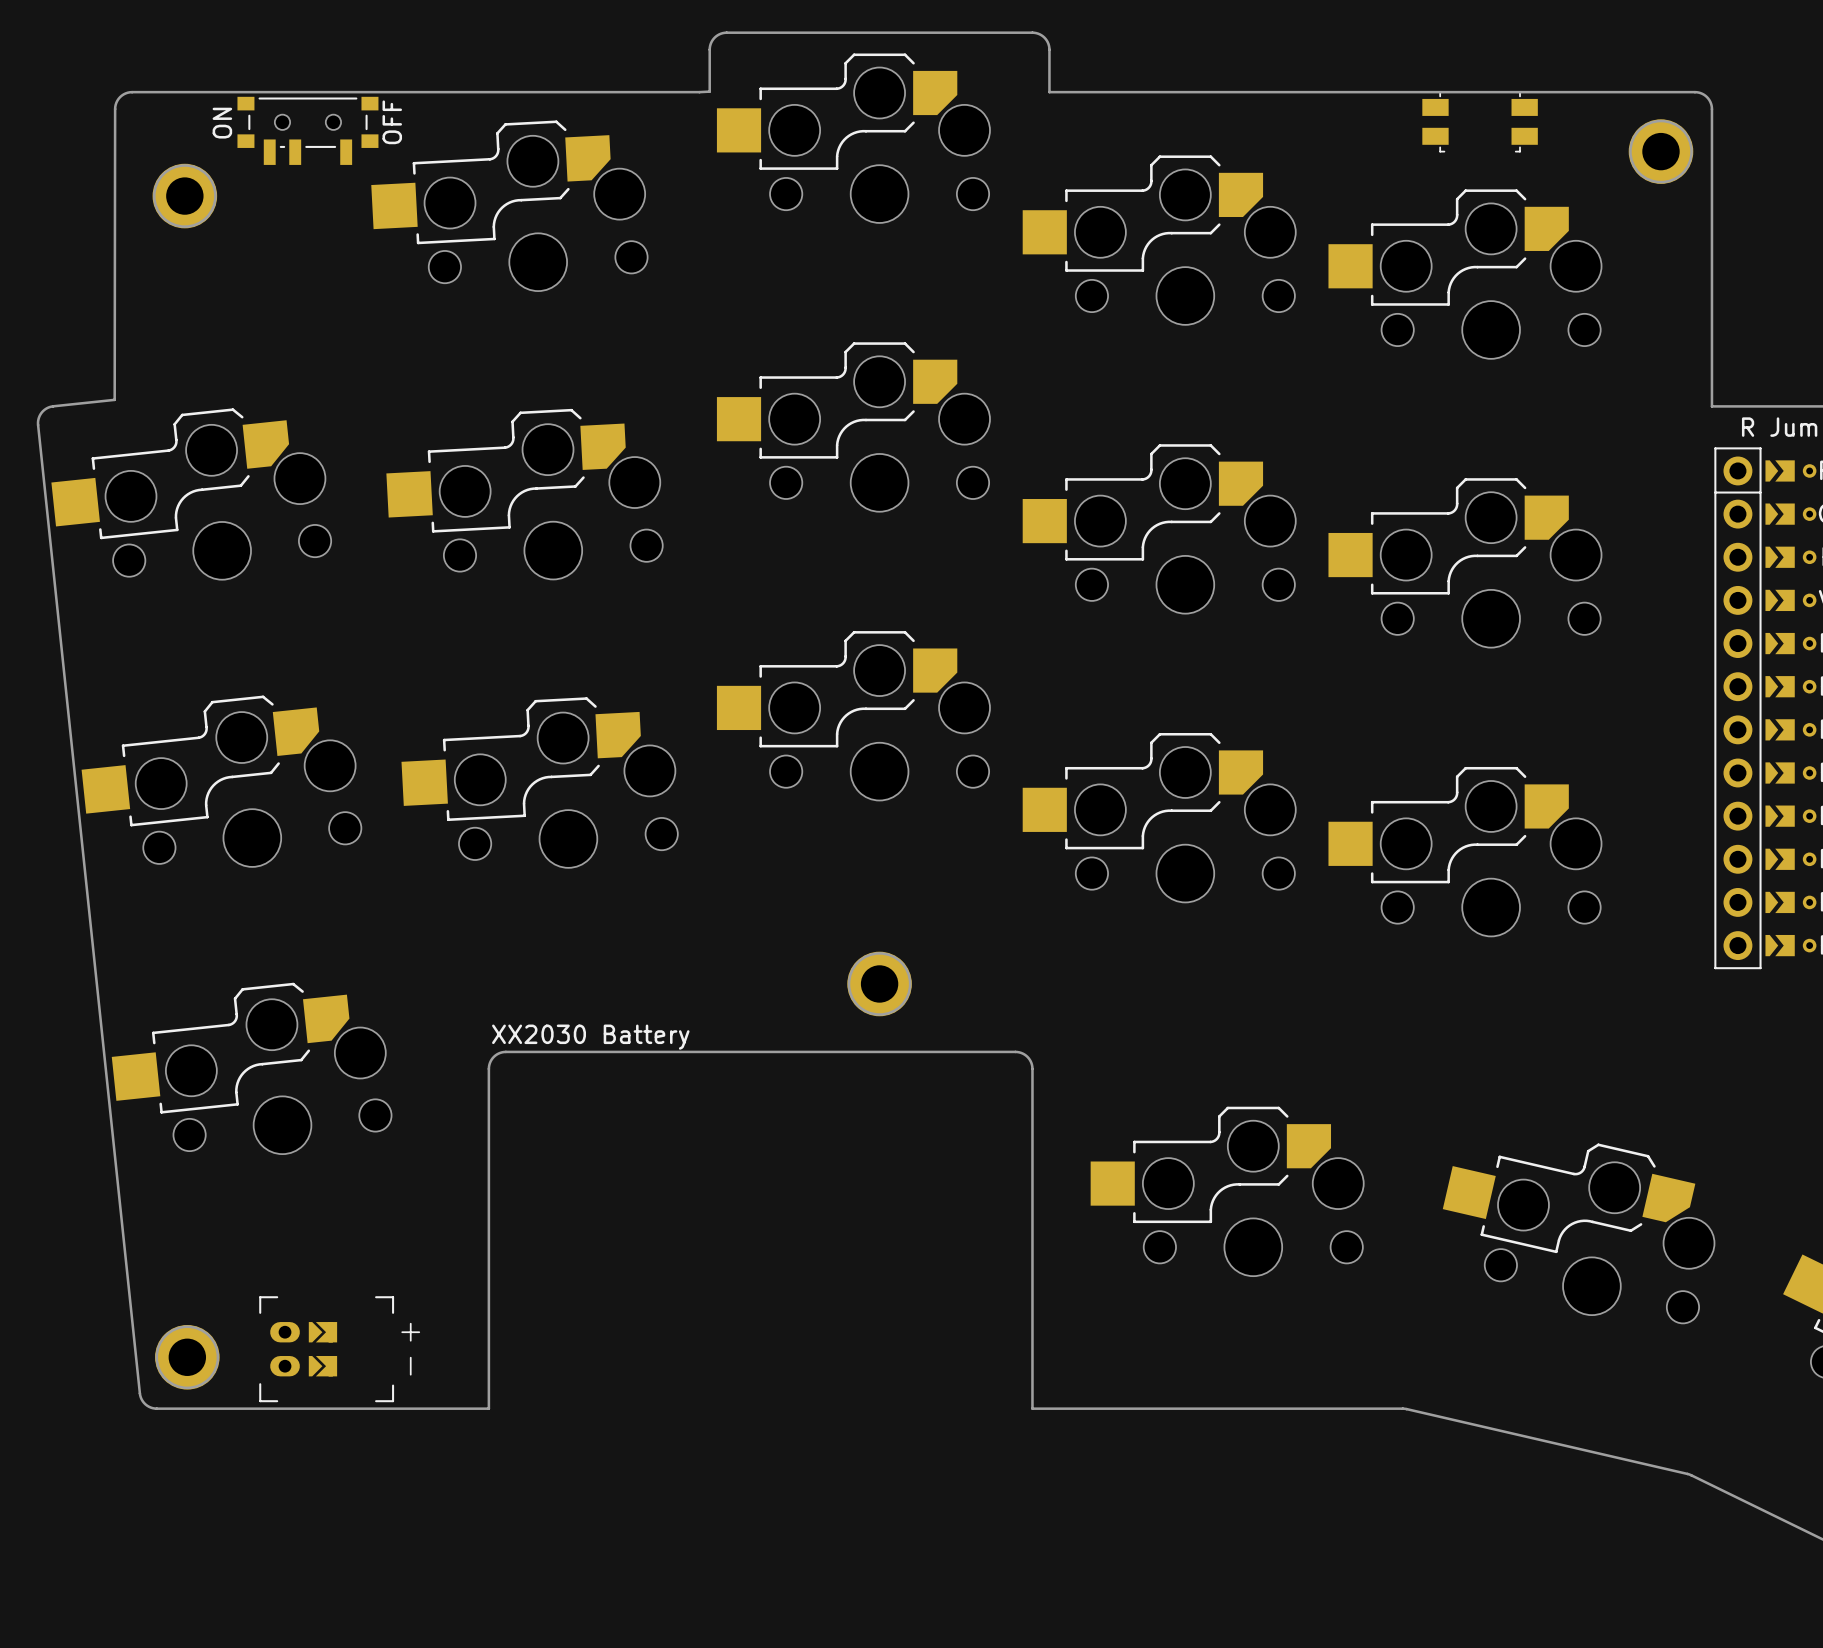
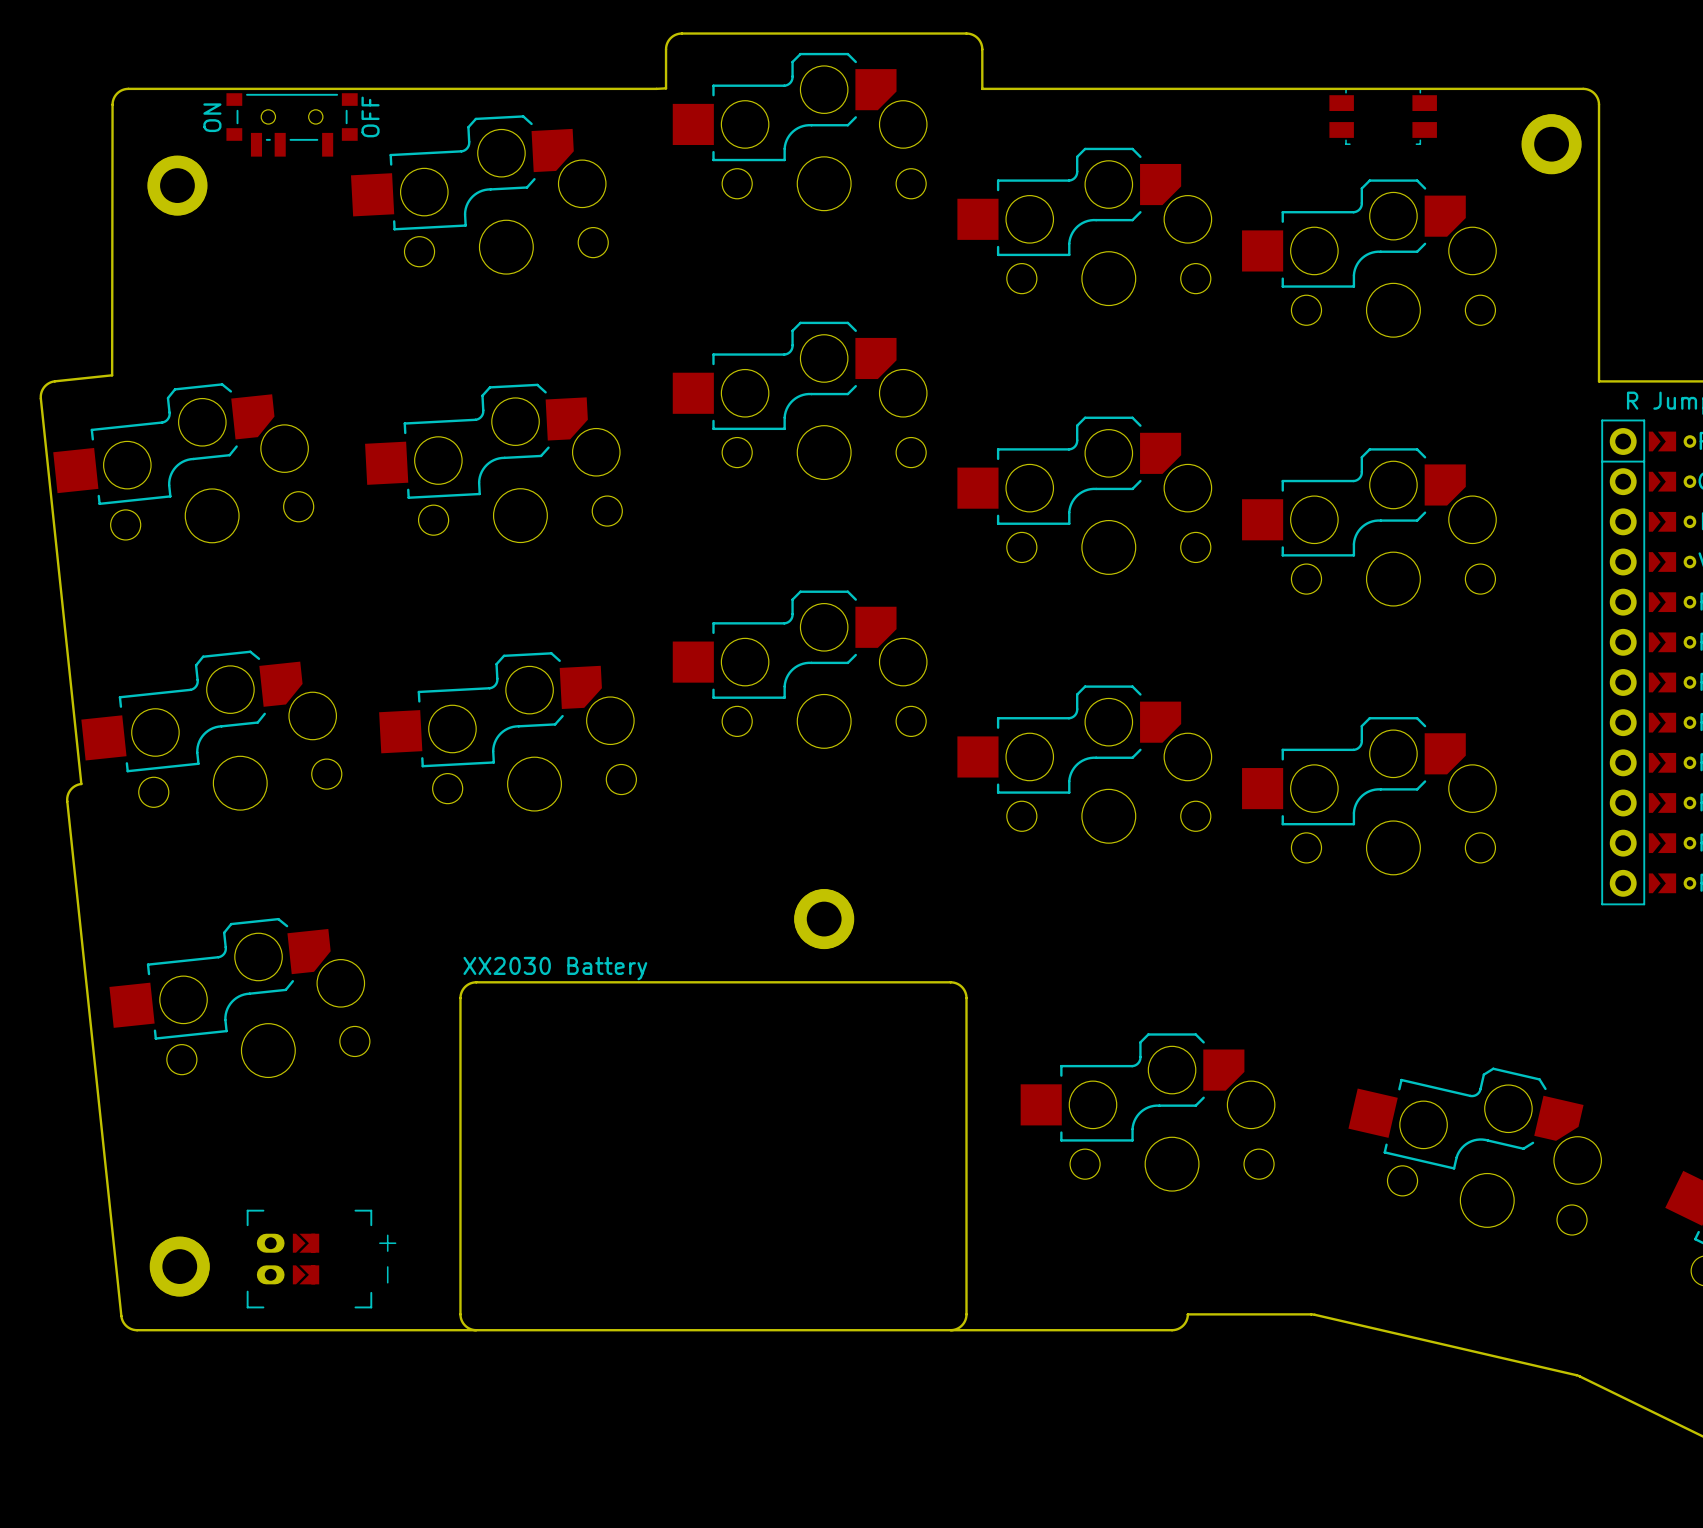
board edge: (81, 838) (139, 1393) (142, 1401) (148, 1406) (156, 1408) (488, 1408) -> (476, 1330) (465, 1325) (460, 1314)
board edge: none -> (81, 784) (70, 789) (67, 801) (121, 1316) (123, 1323) (129, 1328) (137, 1330) (1172, 1330) (1183, 1325) (1187, 1314)
board edge: (1032, 1408) (1270, 1408) -> (966, 1314) (961, 1325) (950, 1330)

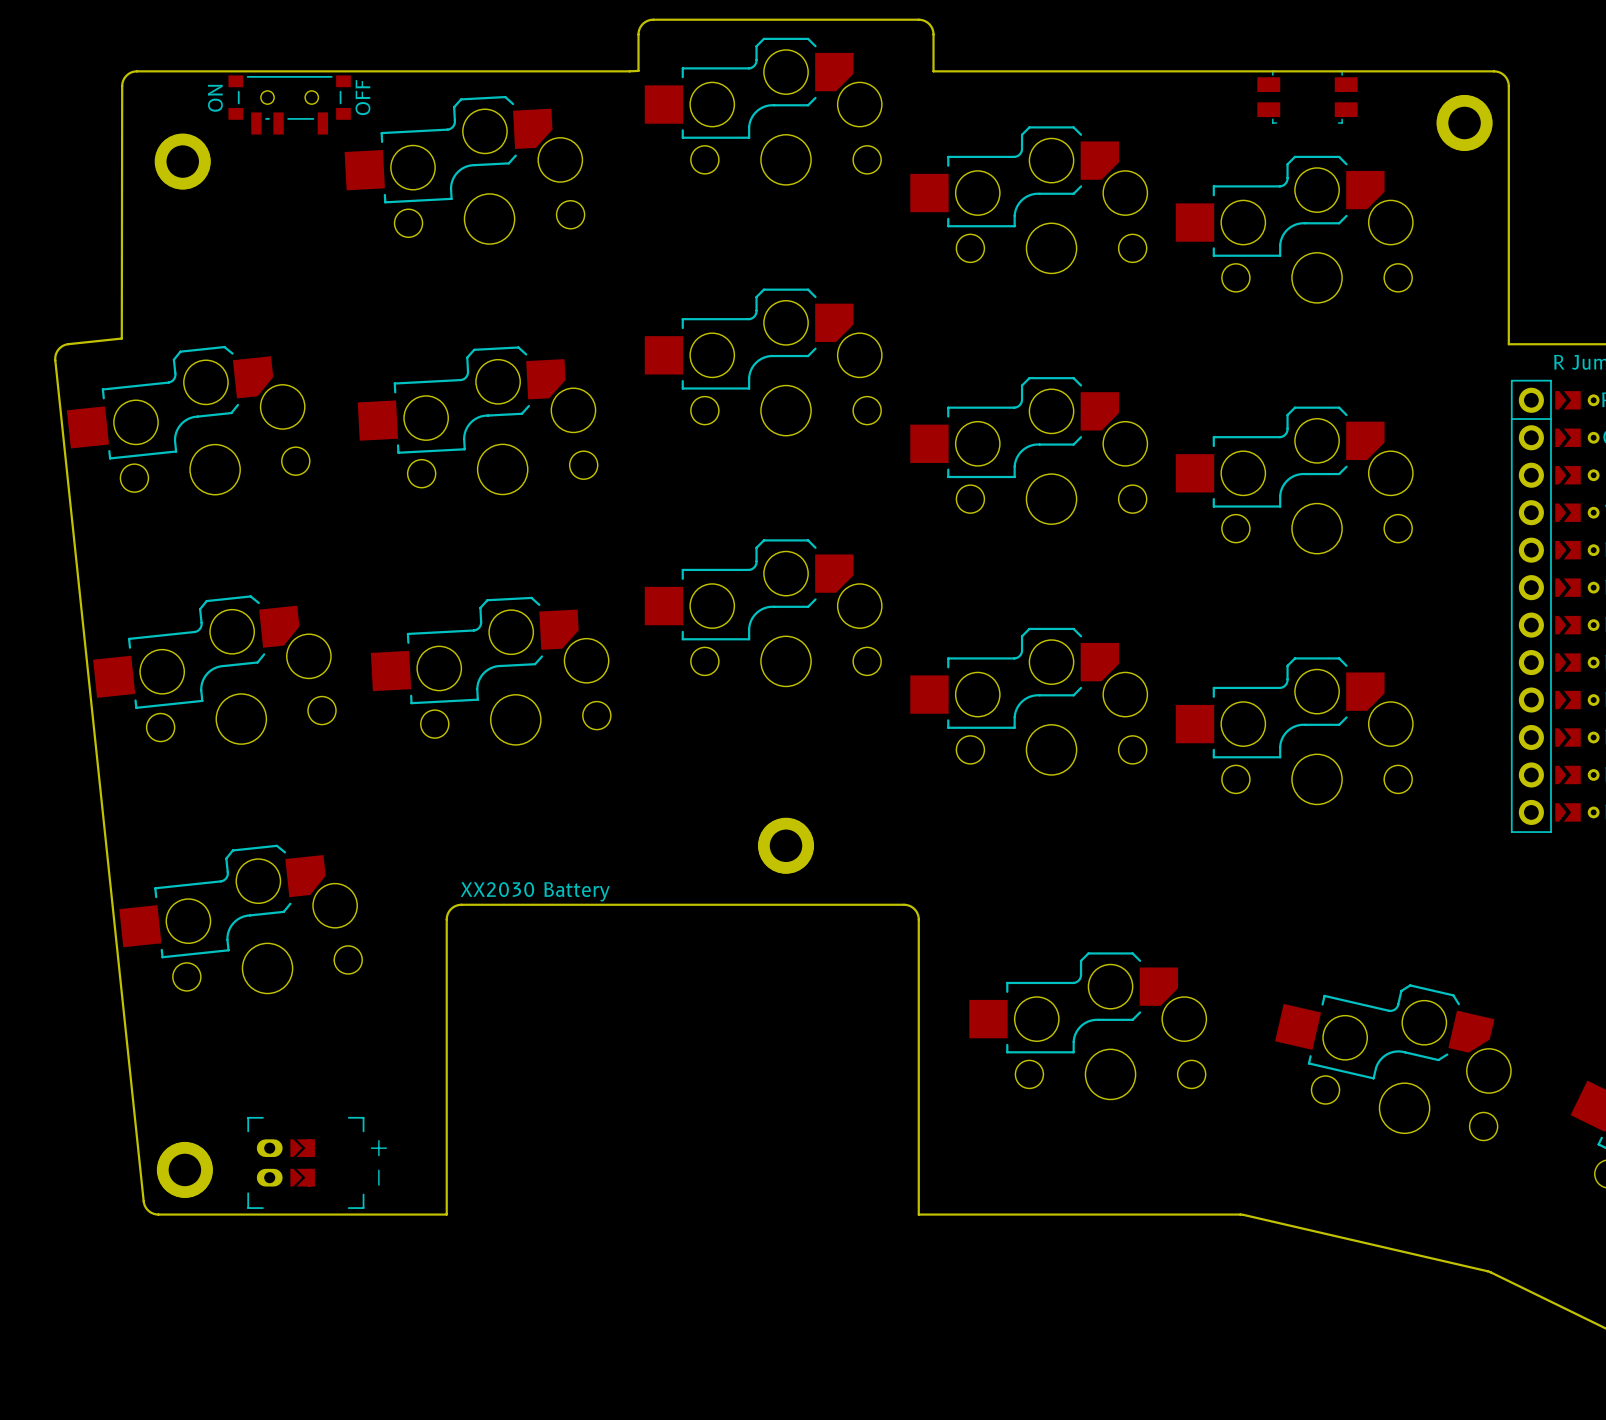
board edge: (81, 784) (70, 789) (67, 801) (121, 1316) (123, 1323) (129, 1328) (137, 1330) (1172, 1330) (1183, 1325) (1187, 1314) -> none
board edge: (460, 1314) (465, 1325) (476, 1330) -> (446, 1214) (158, 1214) (151, 1212) (146, 1208) (143, 1201) (93, 719)
board edge: (966, 1314) (961, 1325) (950, 1330) -> (918, 1214) (1125, 1214)

